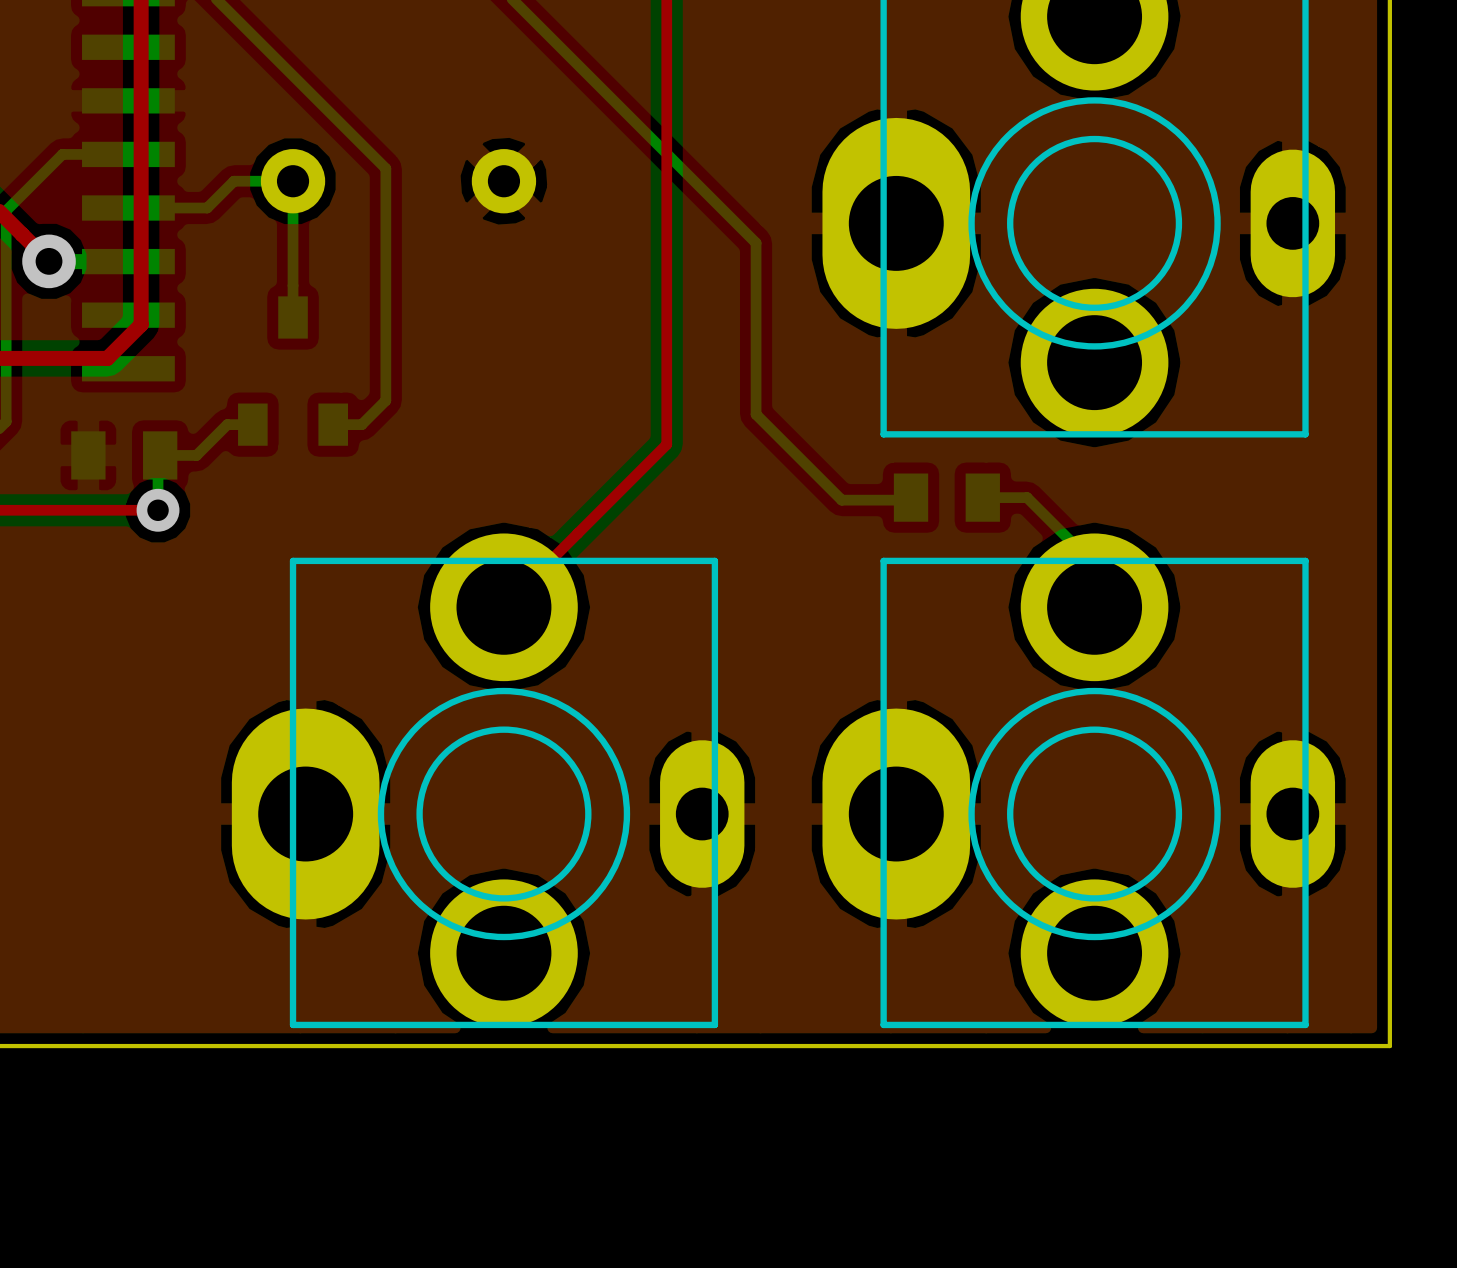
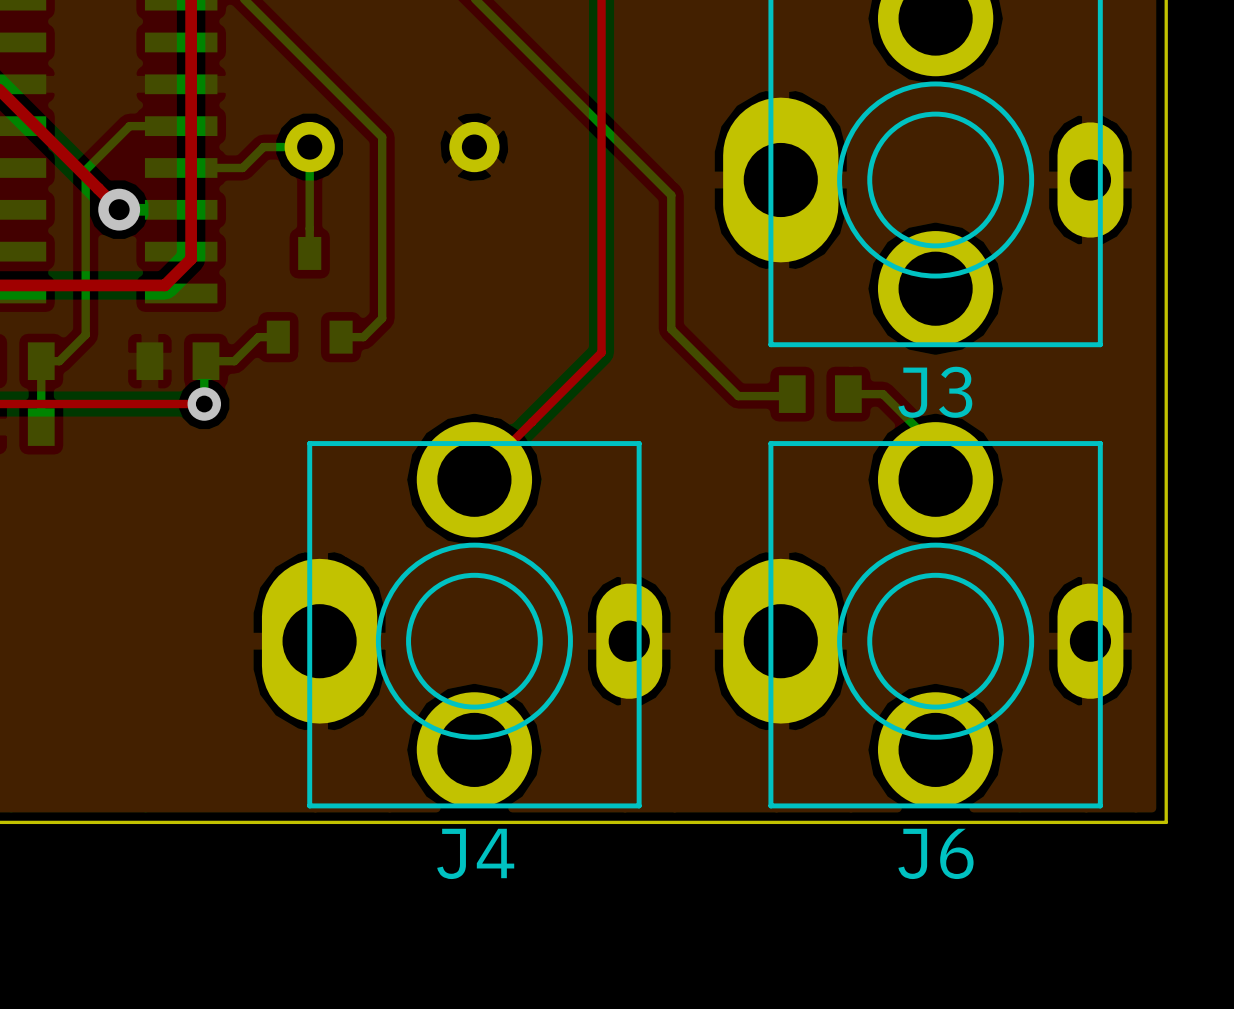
J3 name: none -> J3 (935, 392)
J6 name: none -> J6 (935, 853)
J4 name: none -> J4 (475, 853)

